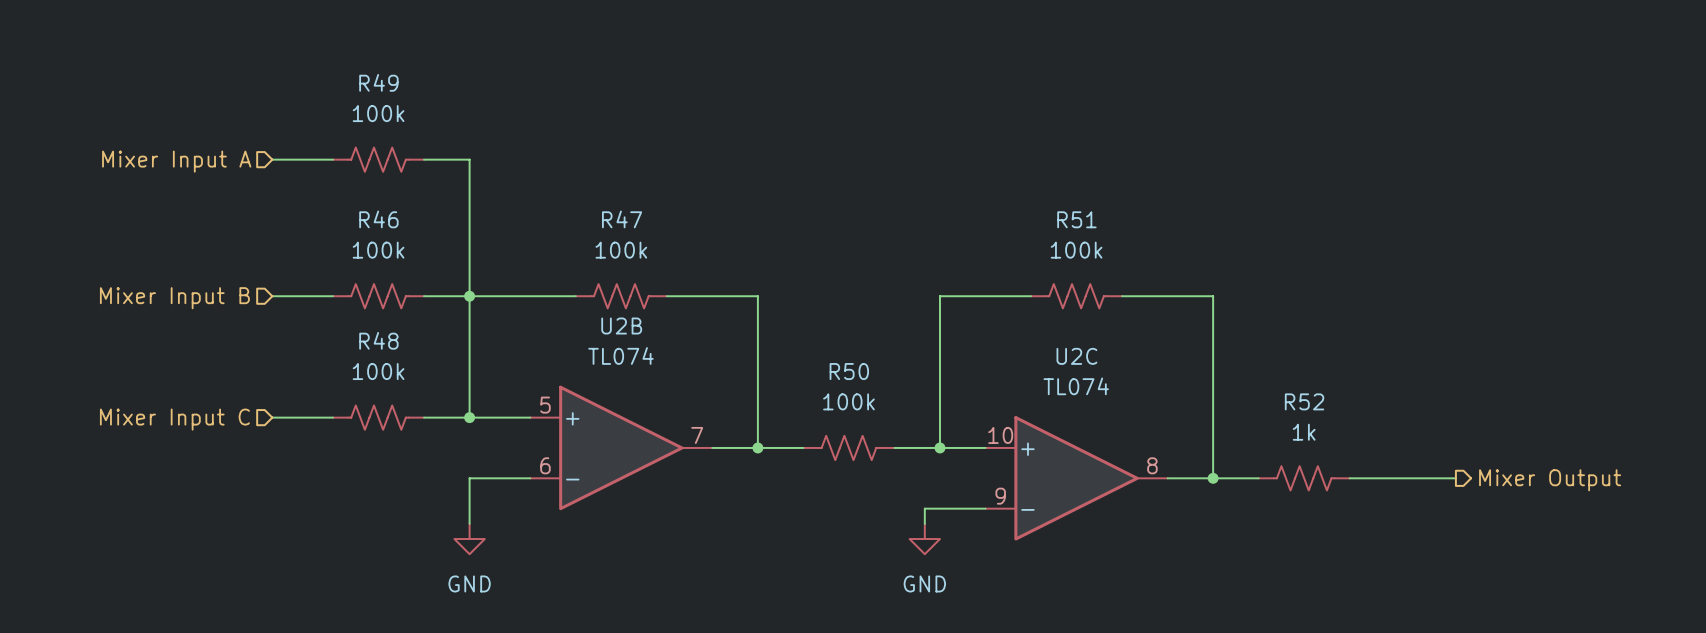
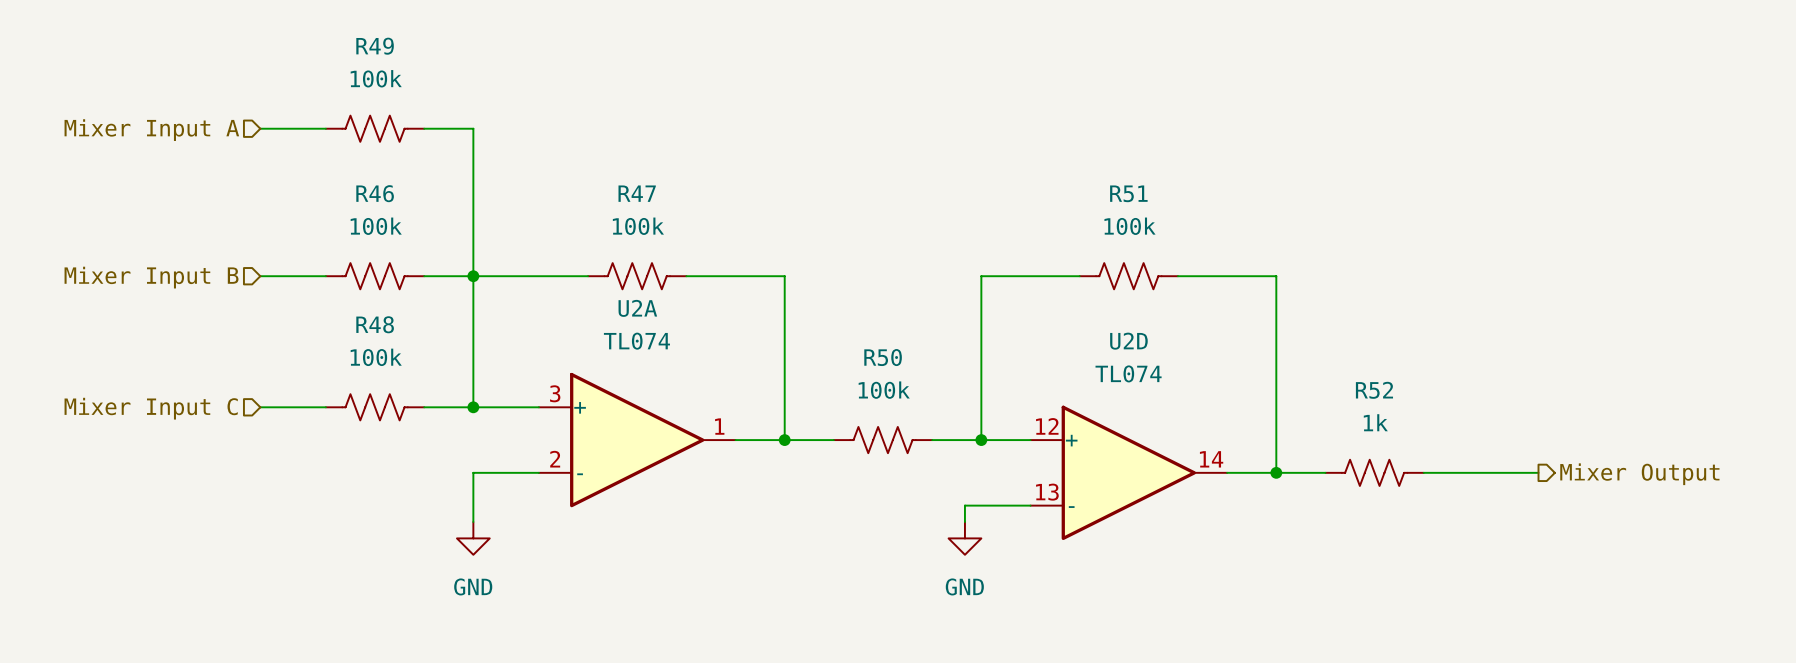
U2B name: U2B (621, 326) -> U2A (637, 308)
U2C name: U2C (1076, 356) -> U2D (1128, 341)
U2B pin number: 5 (545, 405) -> 3 (555, 393)
U2B pin number: 7 (697, 435) -> 1 (719, 426)
U2C pin number: 10 (1000, 435) -> 12 (1047, 426)
U2B pin number: 6 (545, 465) -> 2 (555, 459)
U2C pin number: 8 (1152, 465) -> 14 (1211, 459)
U2C pin number: 9 (1000, 496) -> 13 (1047, 492)

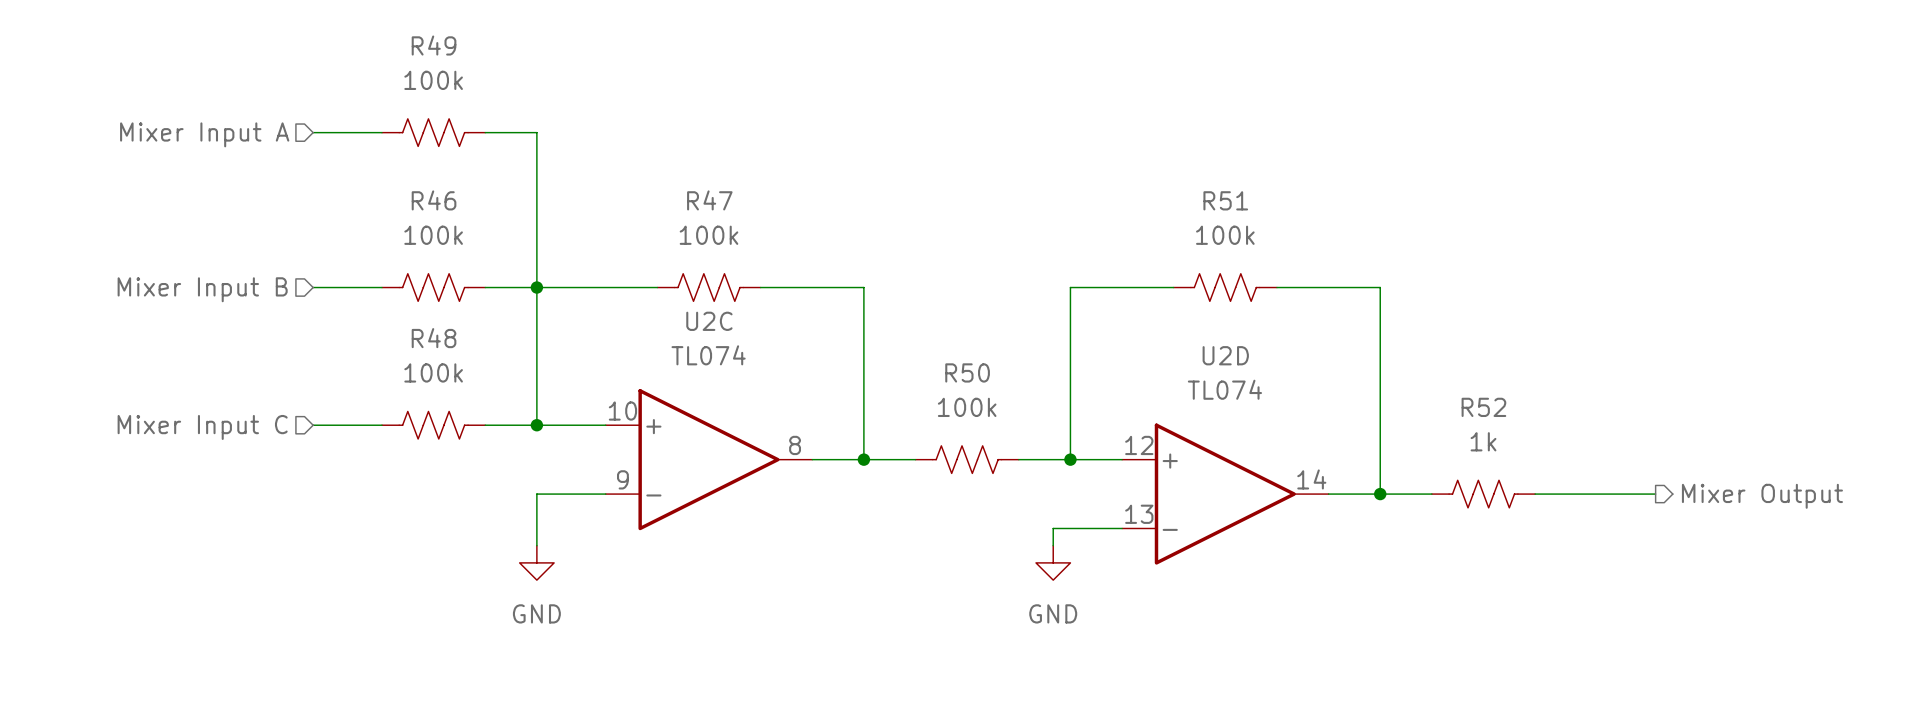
U2A name: U2A (637, 308) -> U2C (709, 321)
U2A pin number: 3 (555, 393) -> 10 (622, 411)
U2A pin number: 1 (719, 426) -> 8 (795, 445)
U2A pin number: 2 (555, 459) -> 9 (622, 479)

